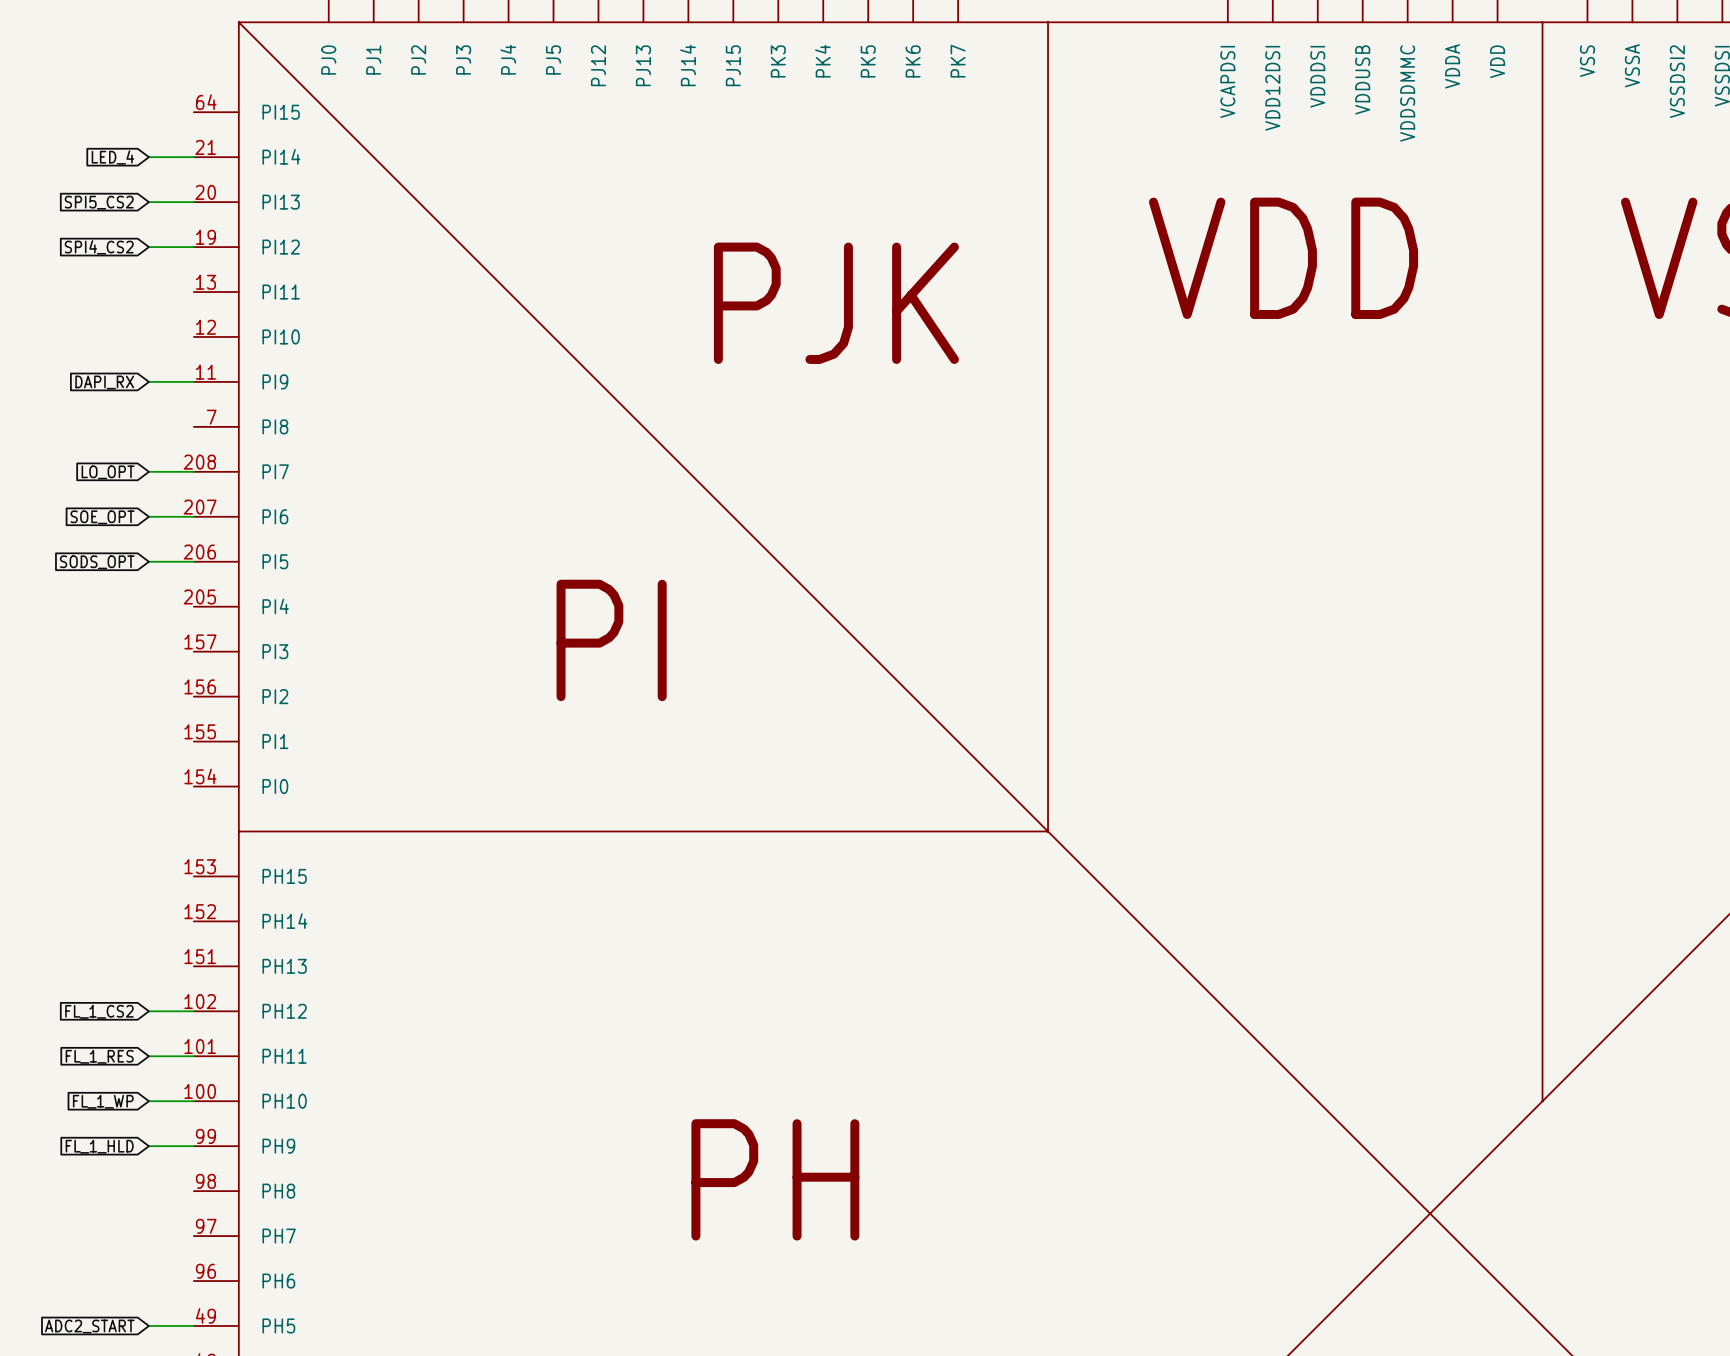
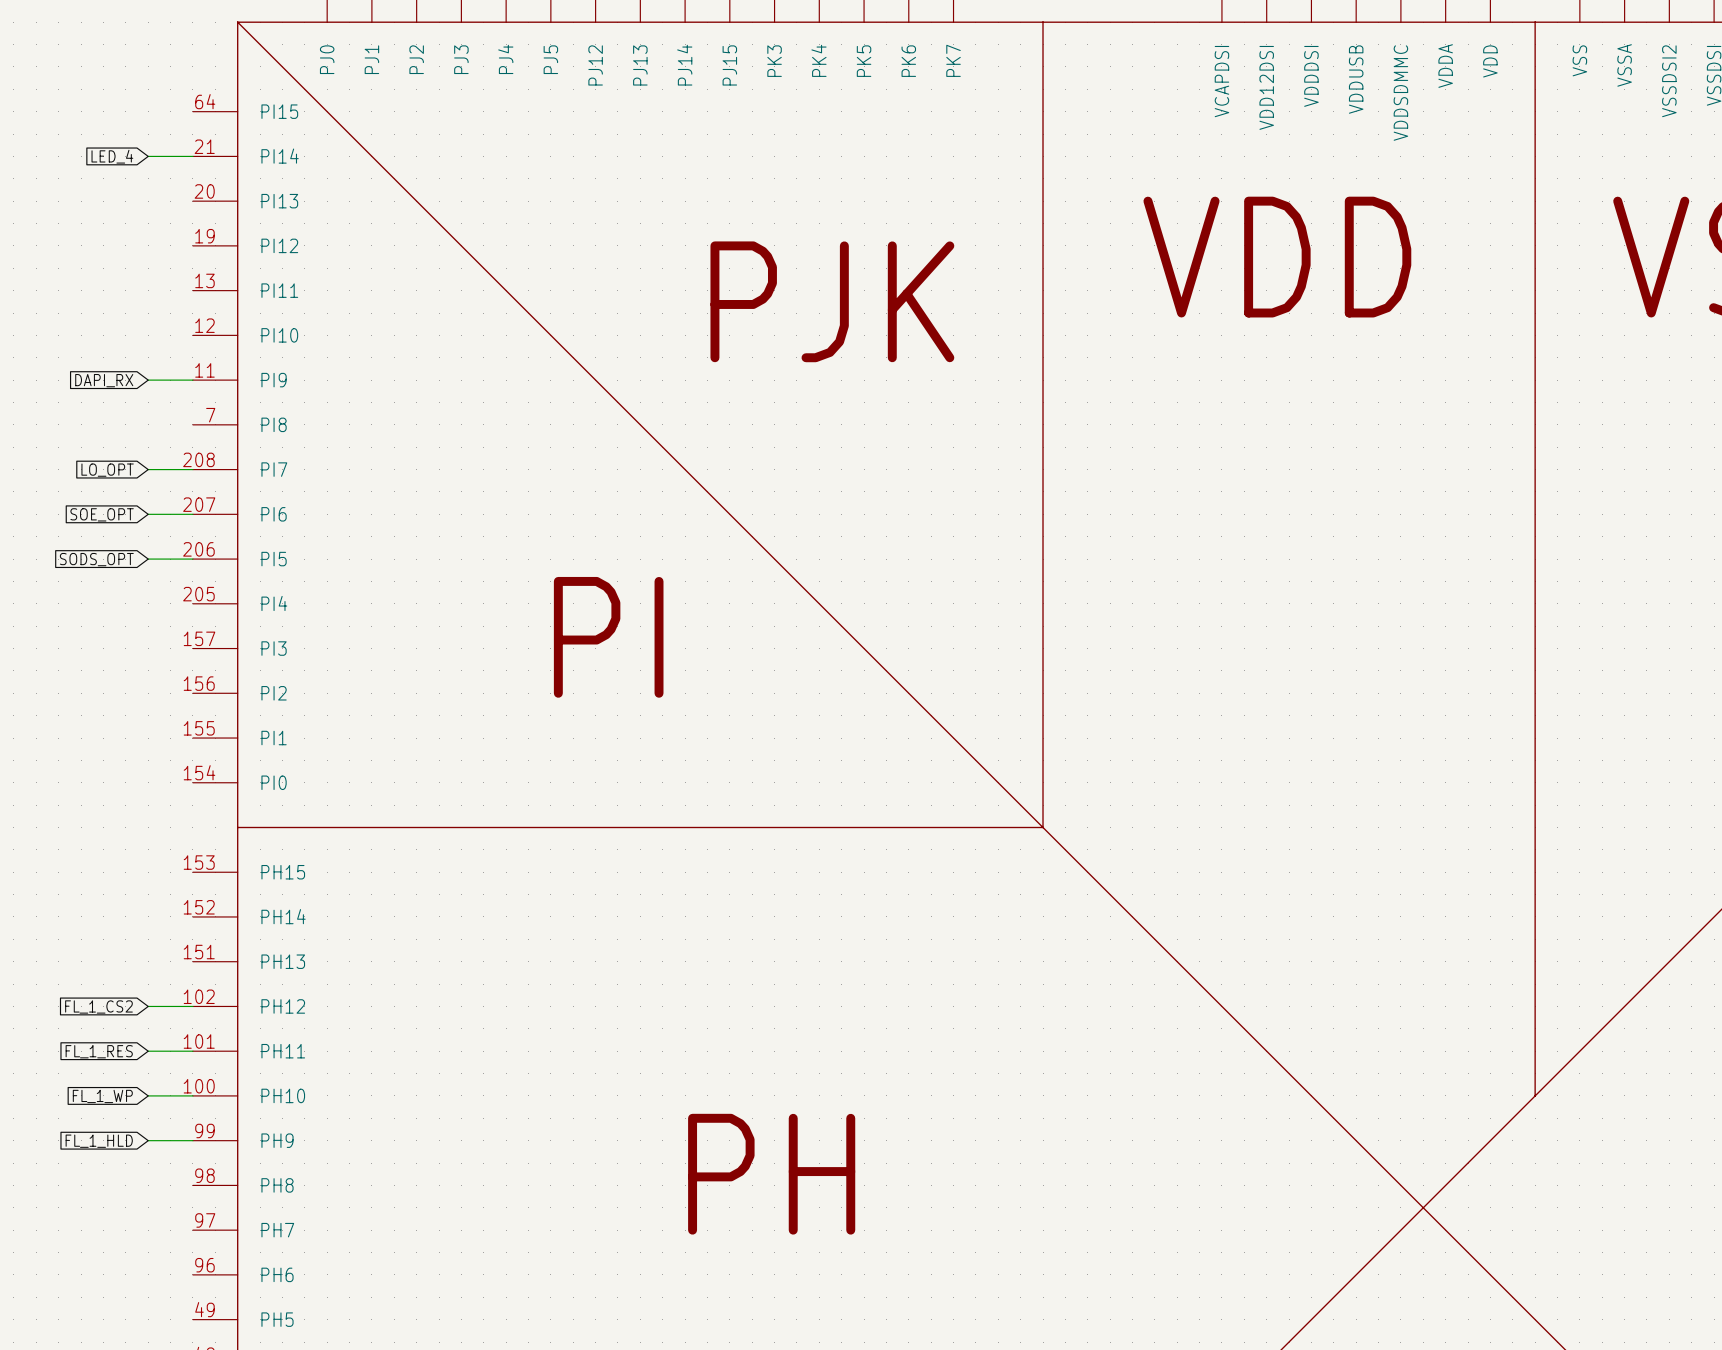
global label: SPI5_CS2 (99, 202) -> none
wire: (148, 202) (193, 202) -> none
global label: SPI4_CS2 (99, 247) -> none
wire: (148, 247) (193, 247) -> none
wire: (148, 1325) (193, 1325) -> none
global label: ADC2_START (89, 1326) -> none

